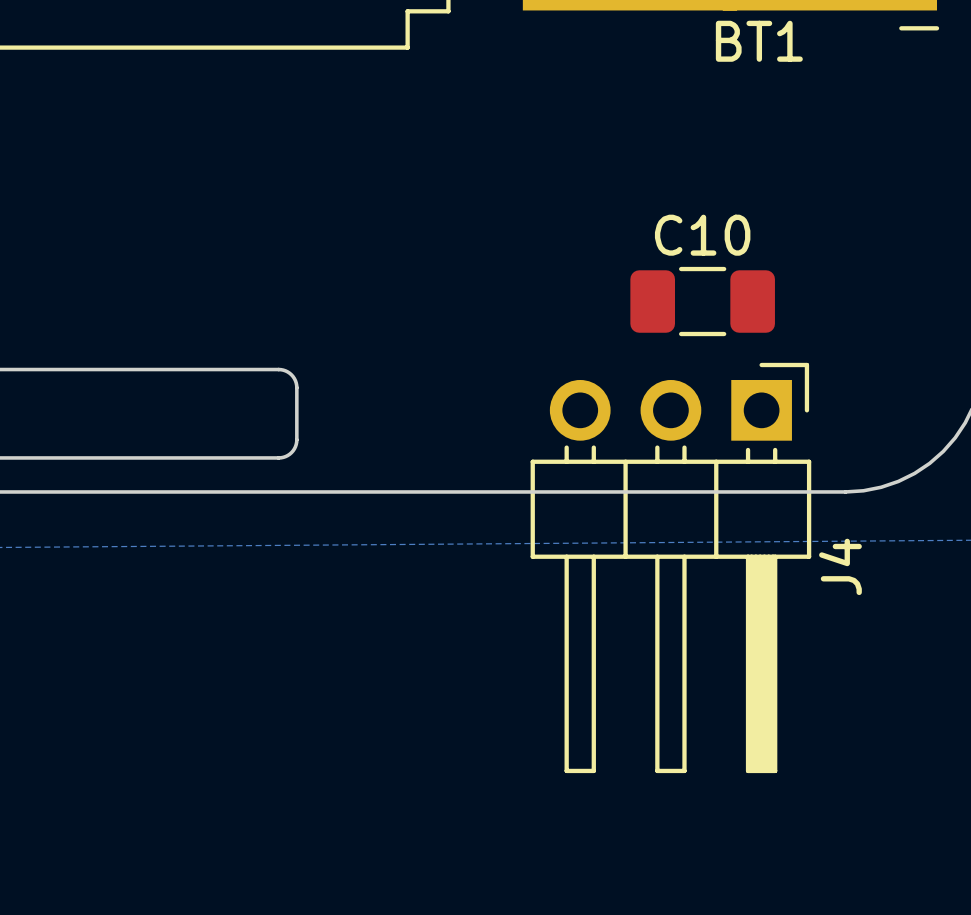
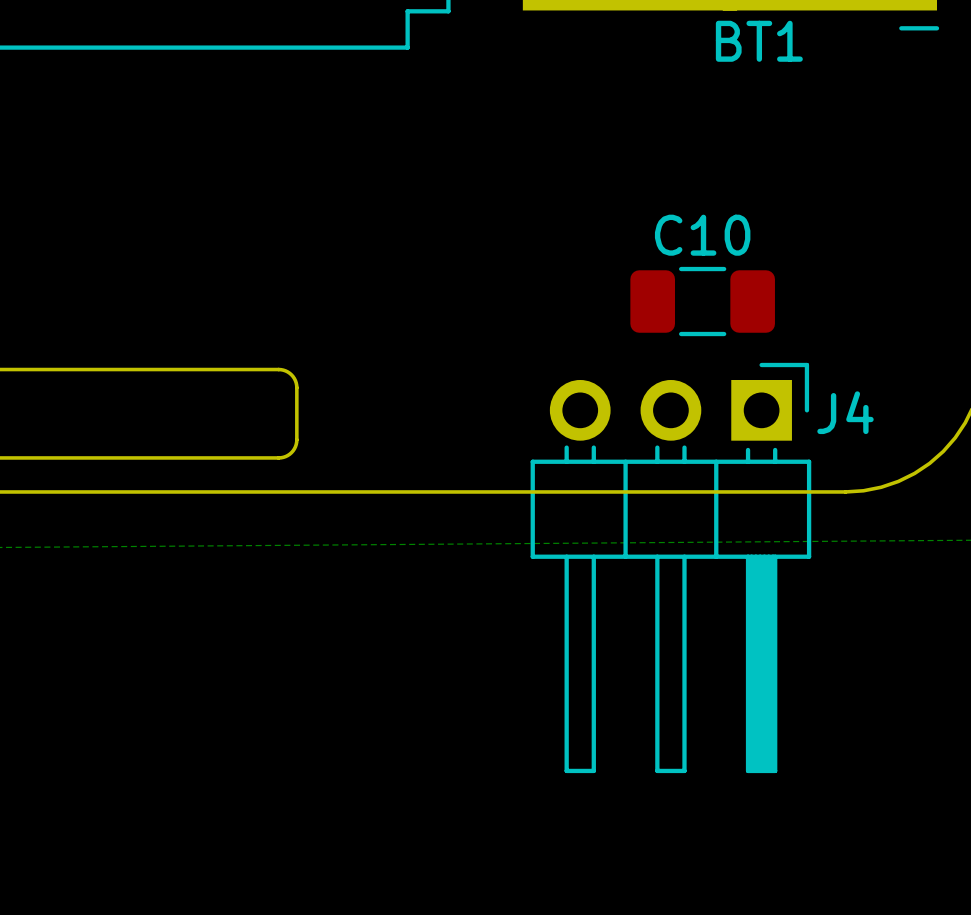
J4 name rotation: 0° (840, 566) -> 90° clockwise (845, 412)
J4 name position: J4 (840, 566) -> J4 (845, 412)

